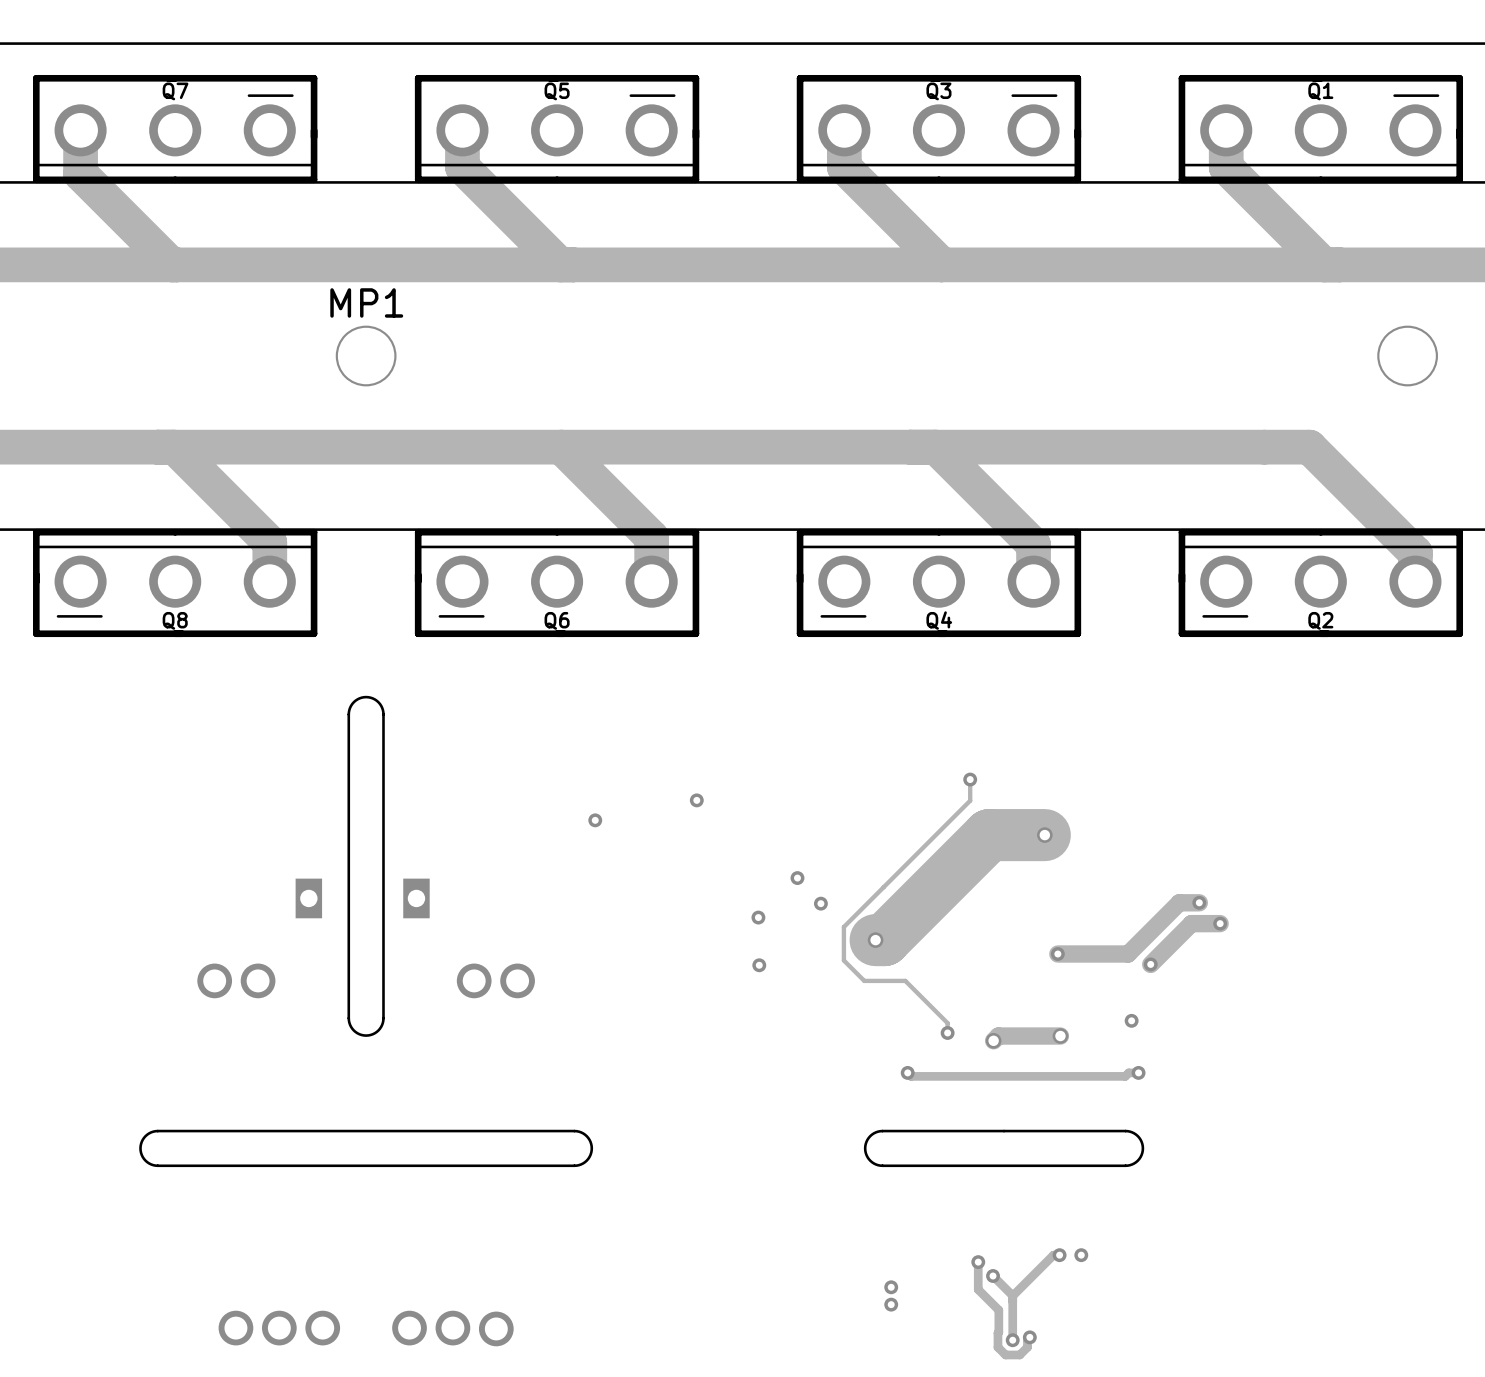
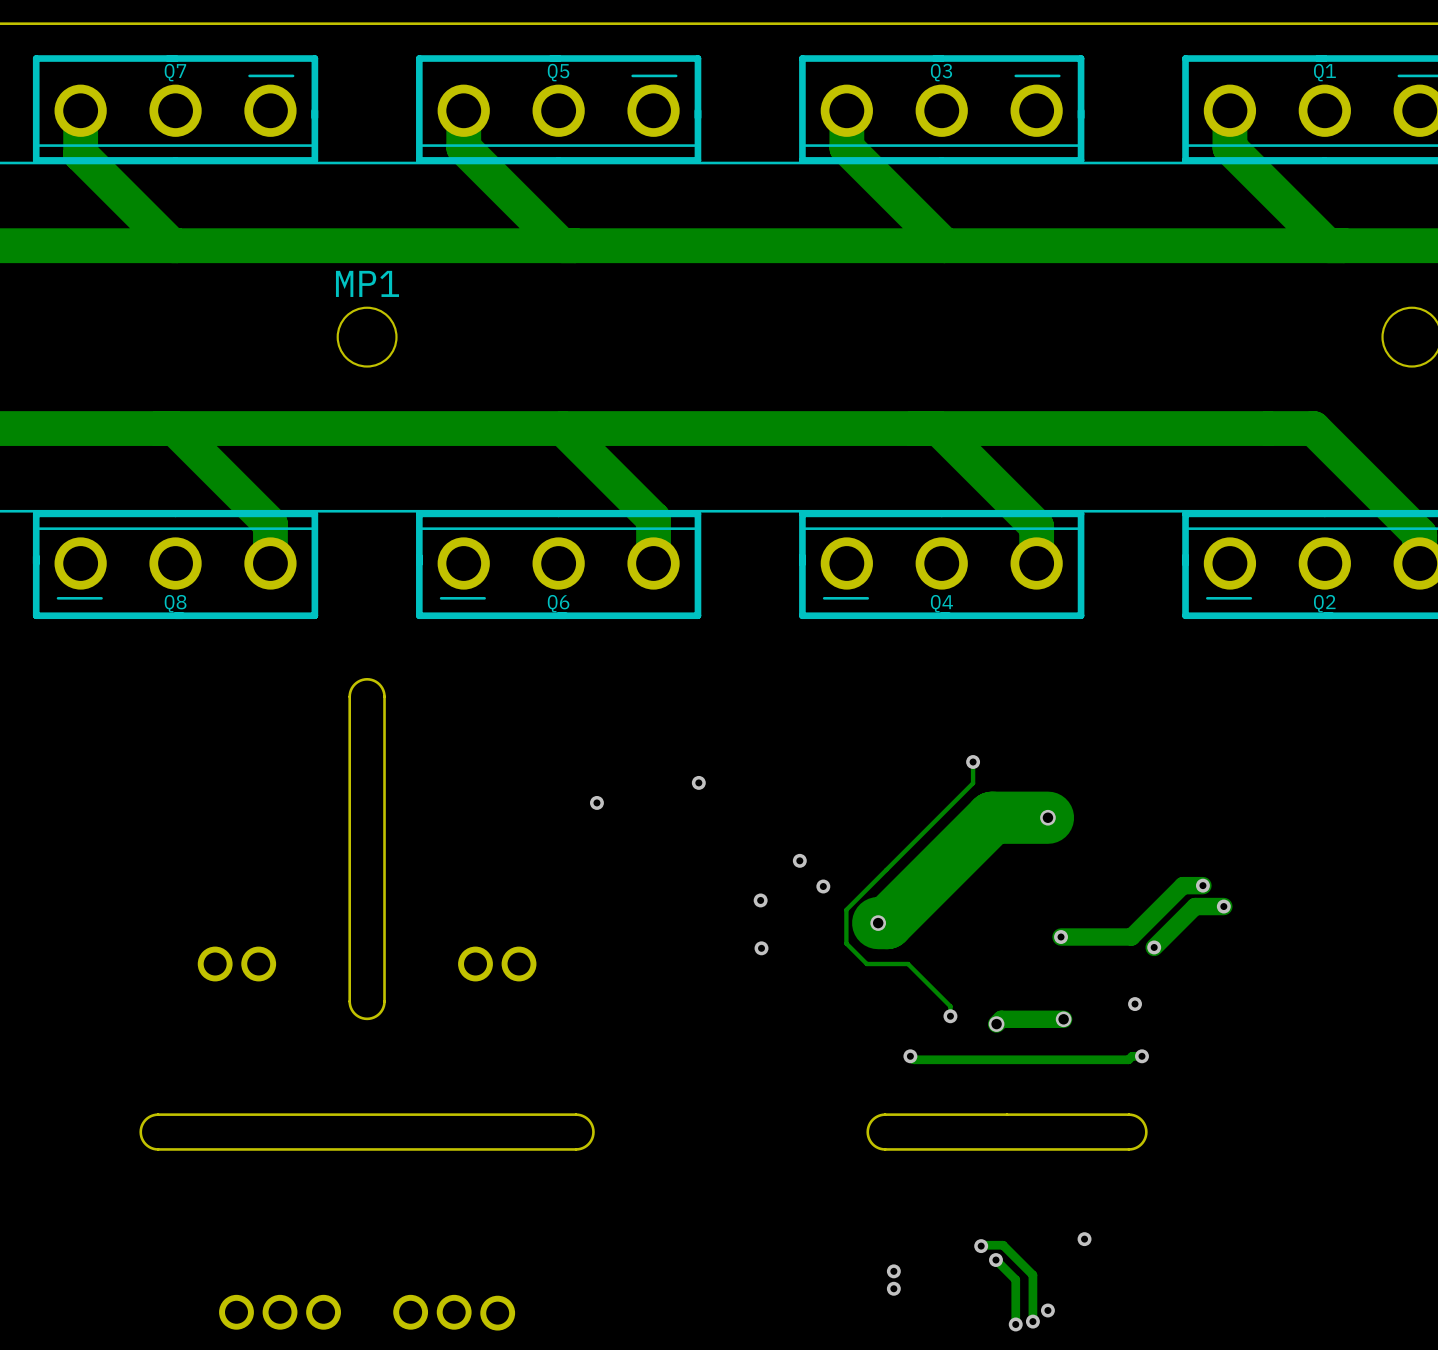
part: (308, 898) -> none
part: (416, 898) -> none
track: (1059, 1255) (1053, 1255) (1012, 1295) -> none
via position: (1059, 1255) -> (1047, 1310)
track: (978, 1262) (978, 1289) (998, 1310) (997, 1347) (1005, 1354) (1019, 1354) (1027, 1347) (1027, 1339) (1029, 1337) -> (982, 1245) (1003, 1245) (1032, 1275) (1032, 1321)

